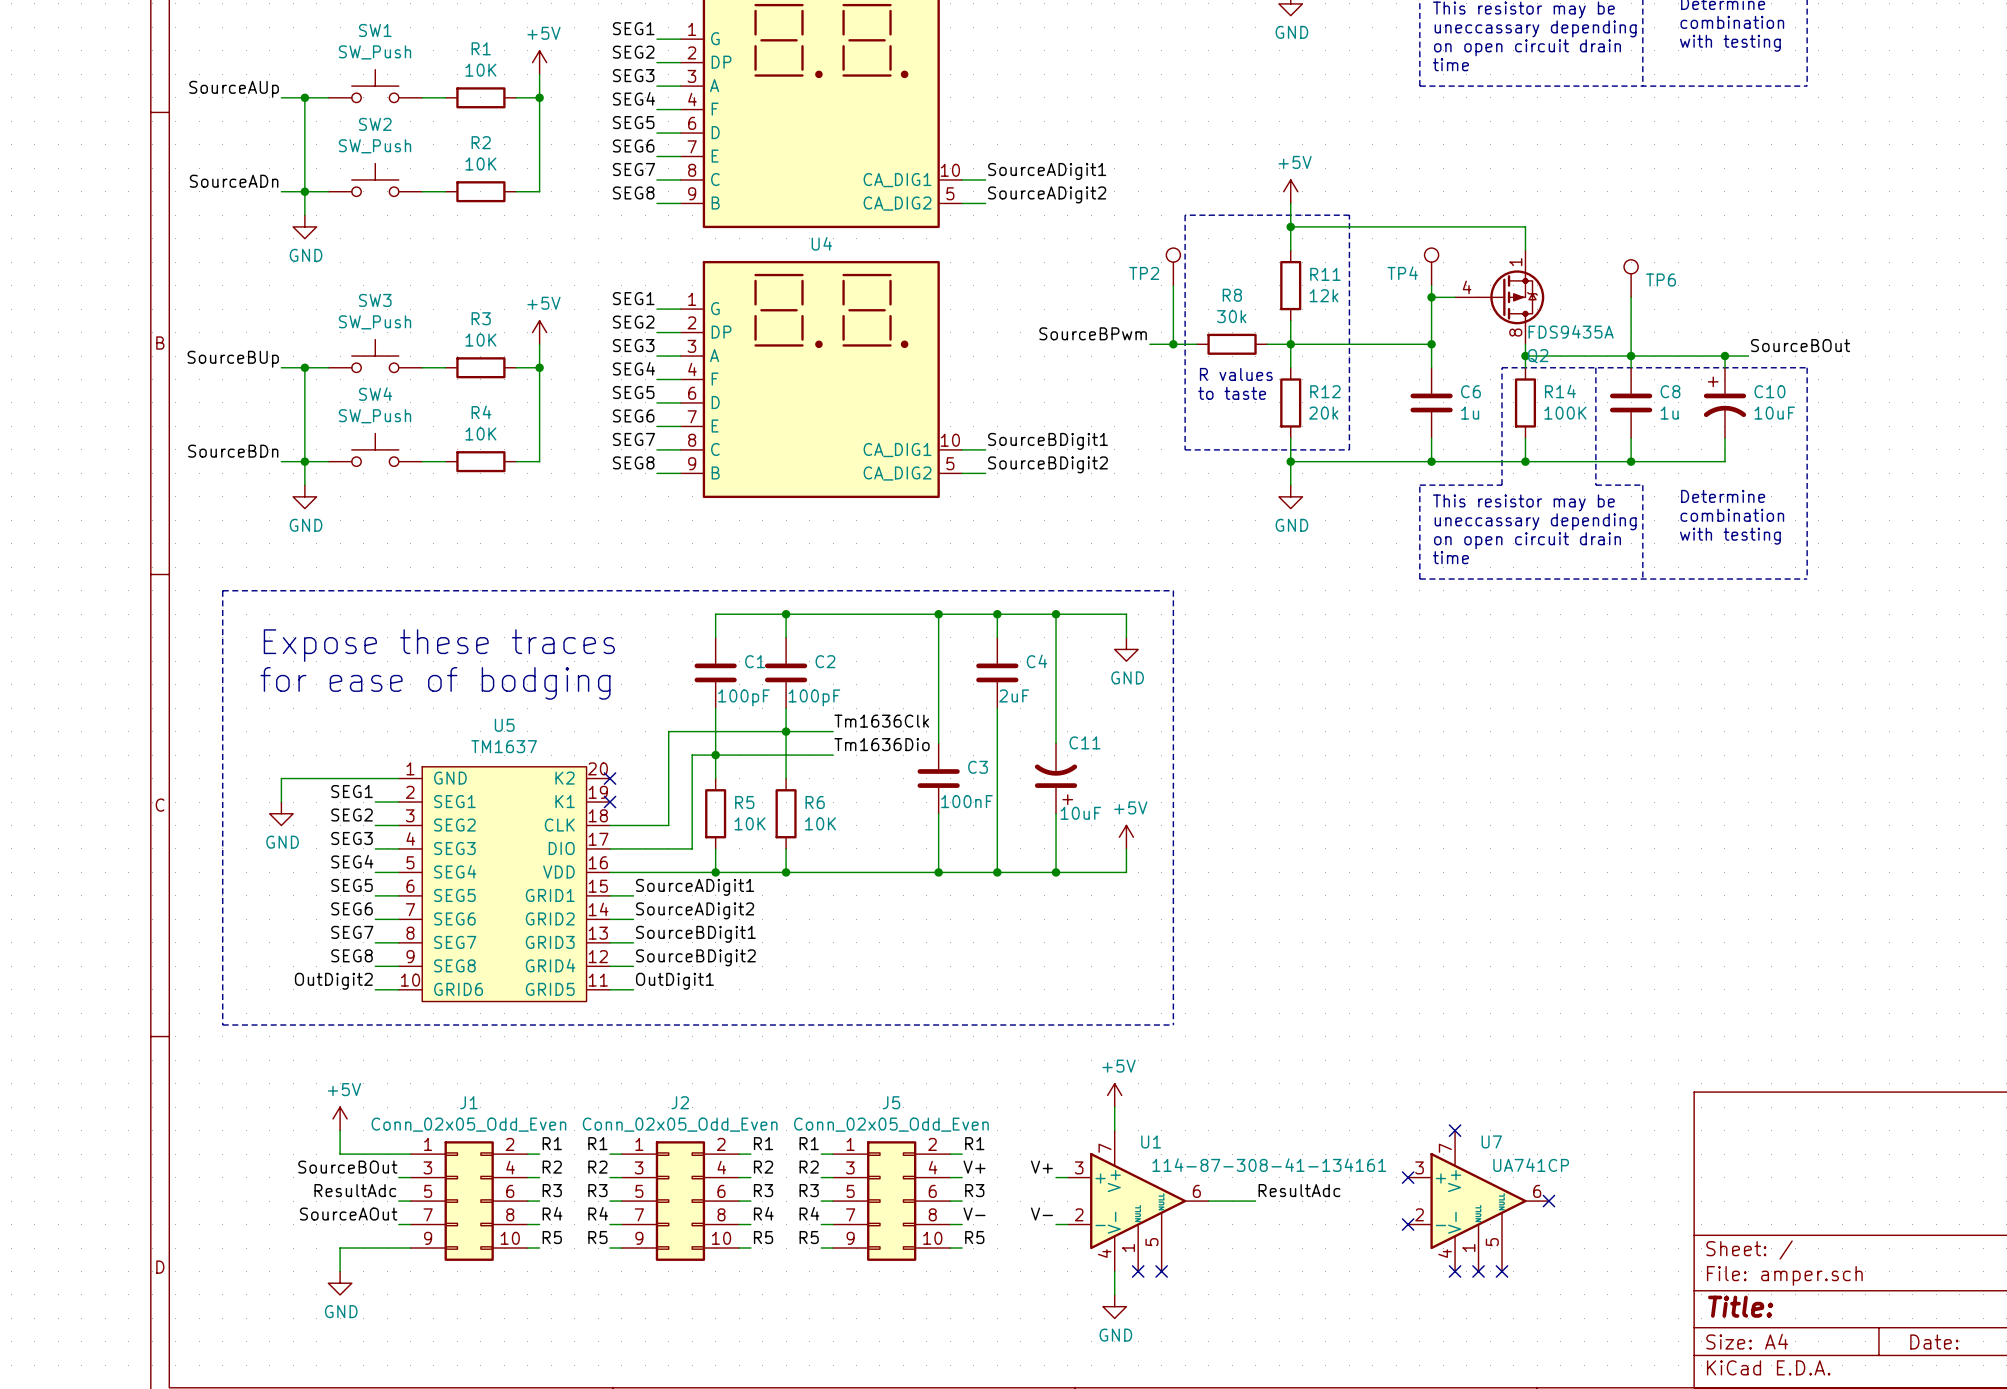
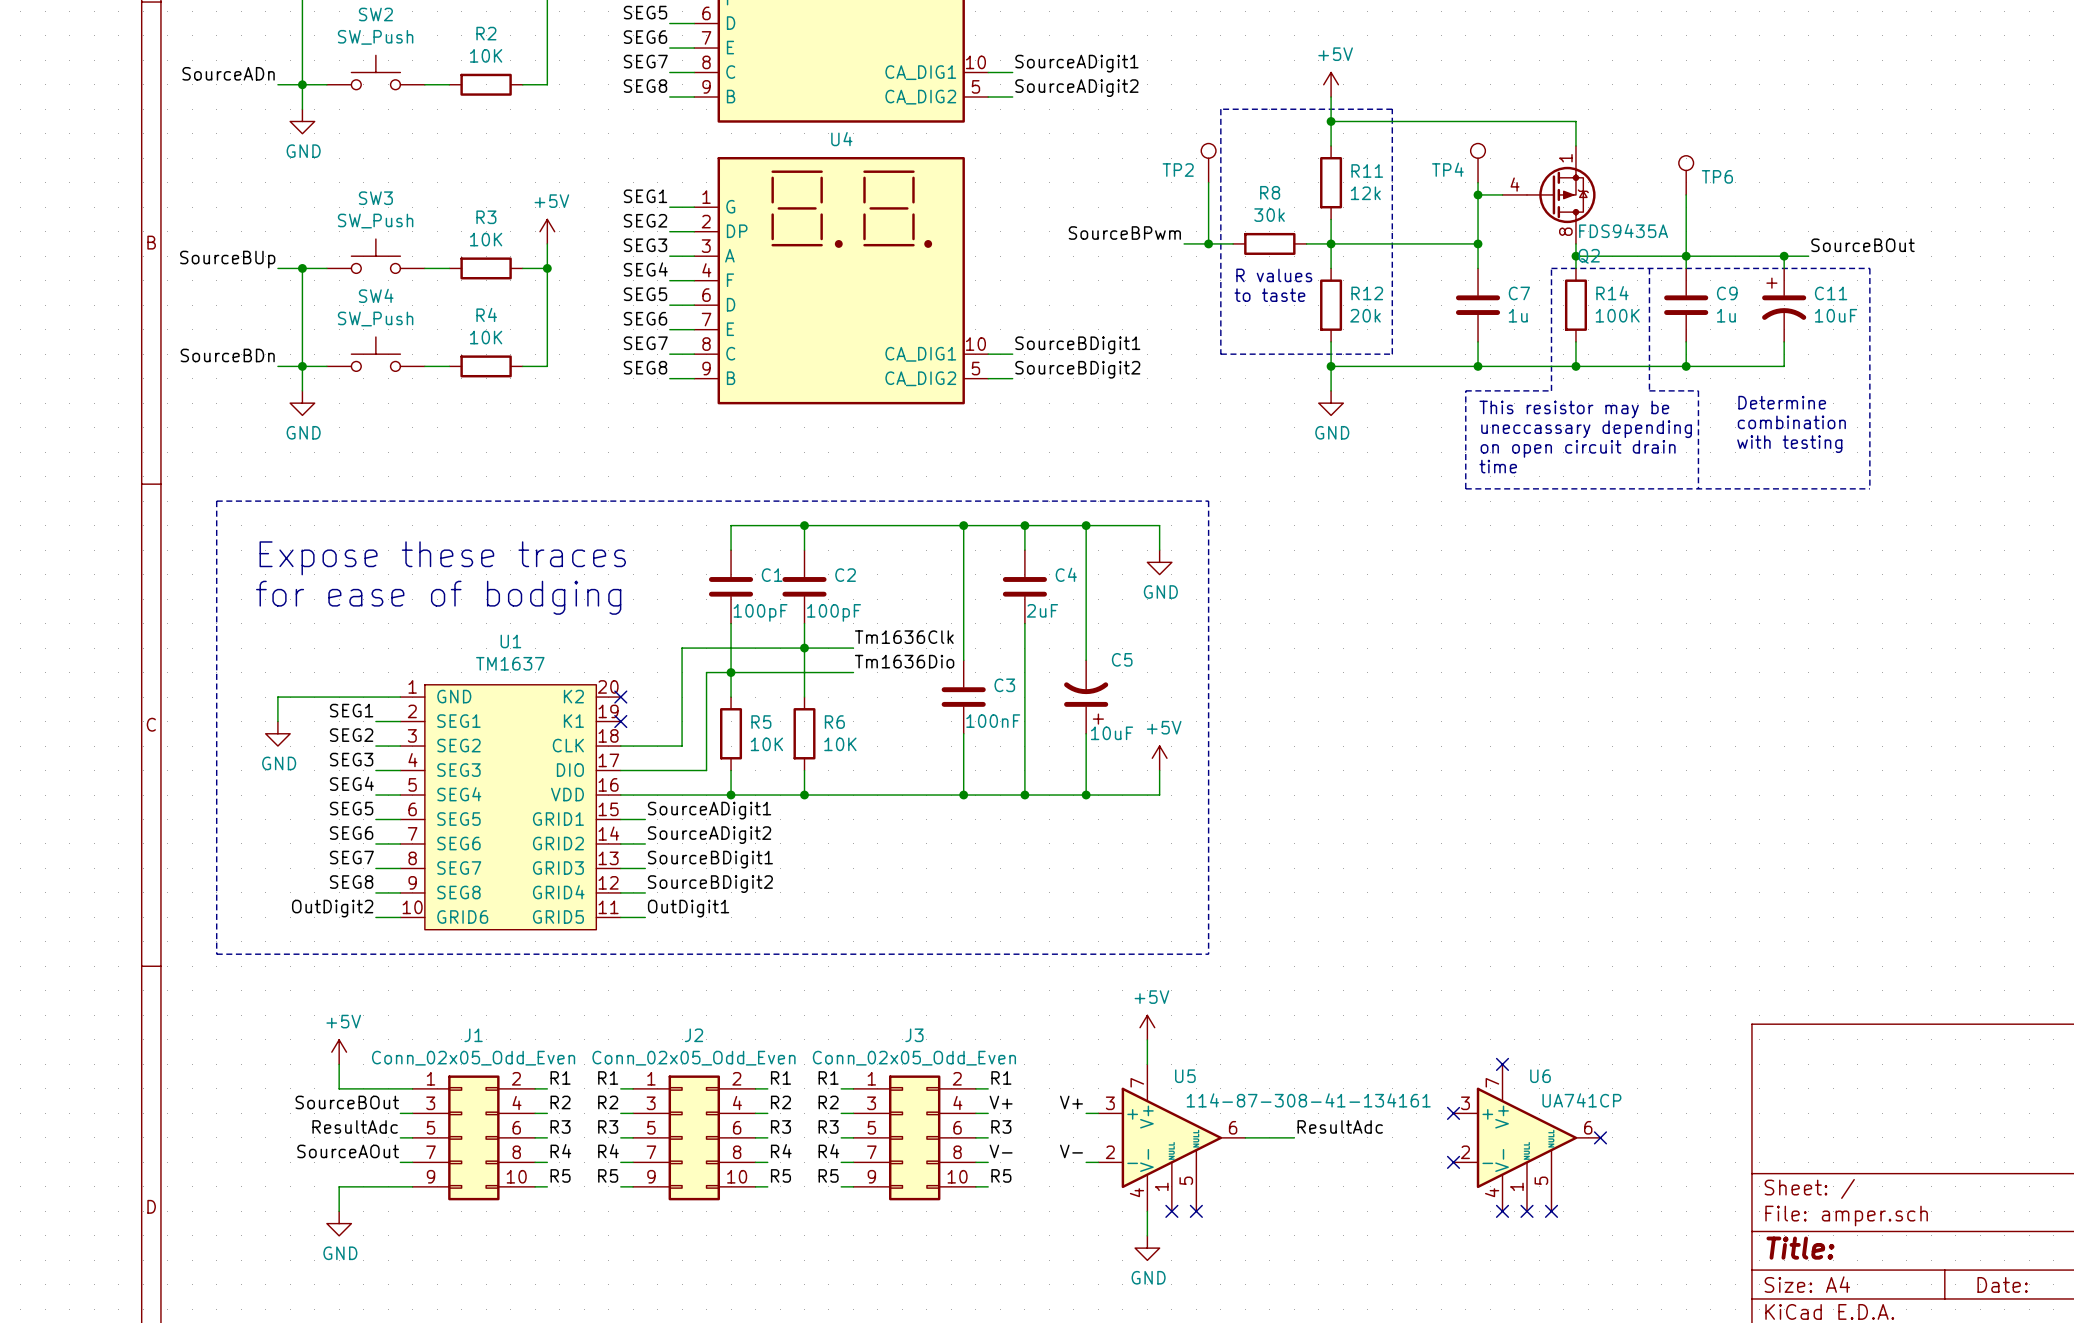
C6 name: C6 (1470, 391) -> C7 (1519, 293)
C8 name: C8 (1670, 391) -> C9 (1727, 293)
C10 name: C10 (1769, 391) -> C11 (1831, 293)
U5 name: U5 (504, 725) -> U1 (510, 641)
C11 name: C11 (1084, 742) -> C5 (1122, 659)
J5 name: J5 (891, 1102) -> J3 (914, 1035)
U1 name: U1 (1151, 1141) -> U5 (1185, 1076)
U7 name: U7 (1491, 1141) -> U6 (1540, 1076)

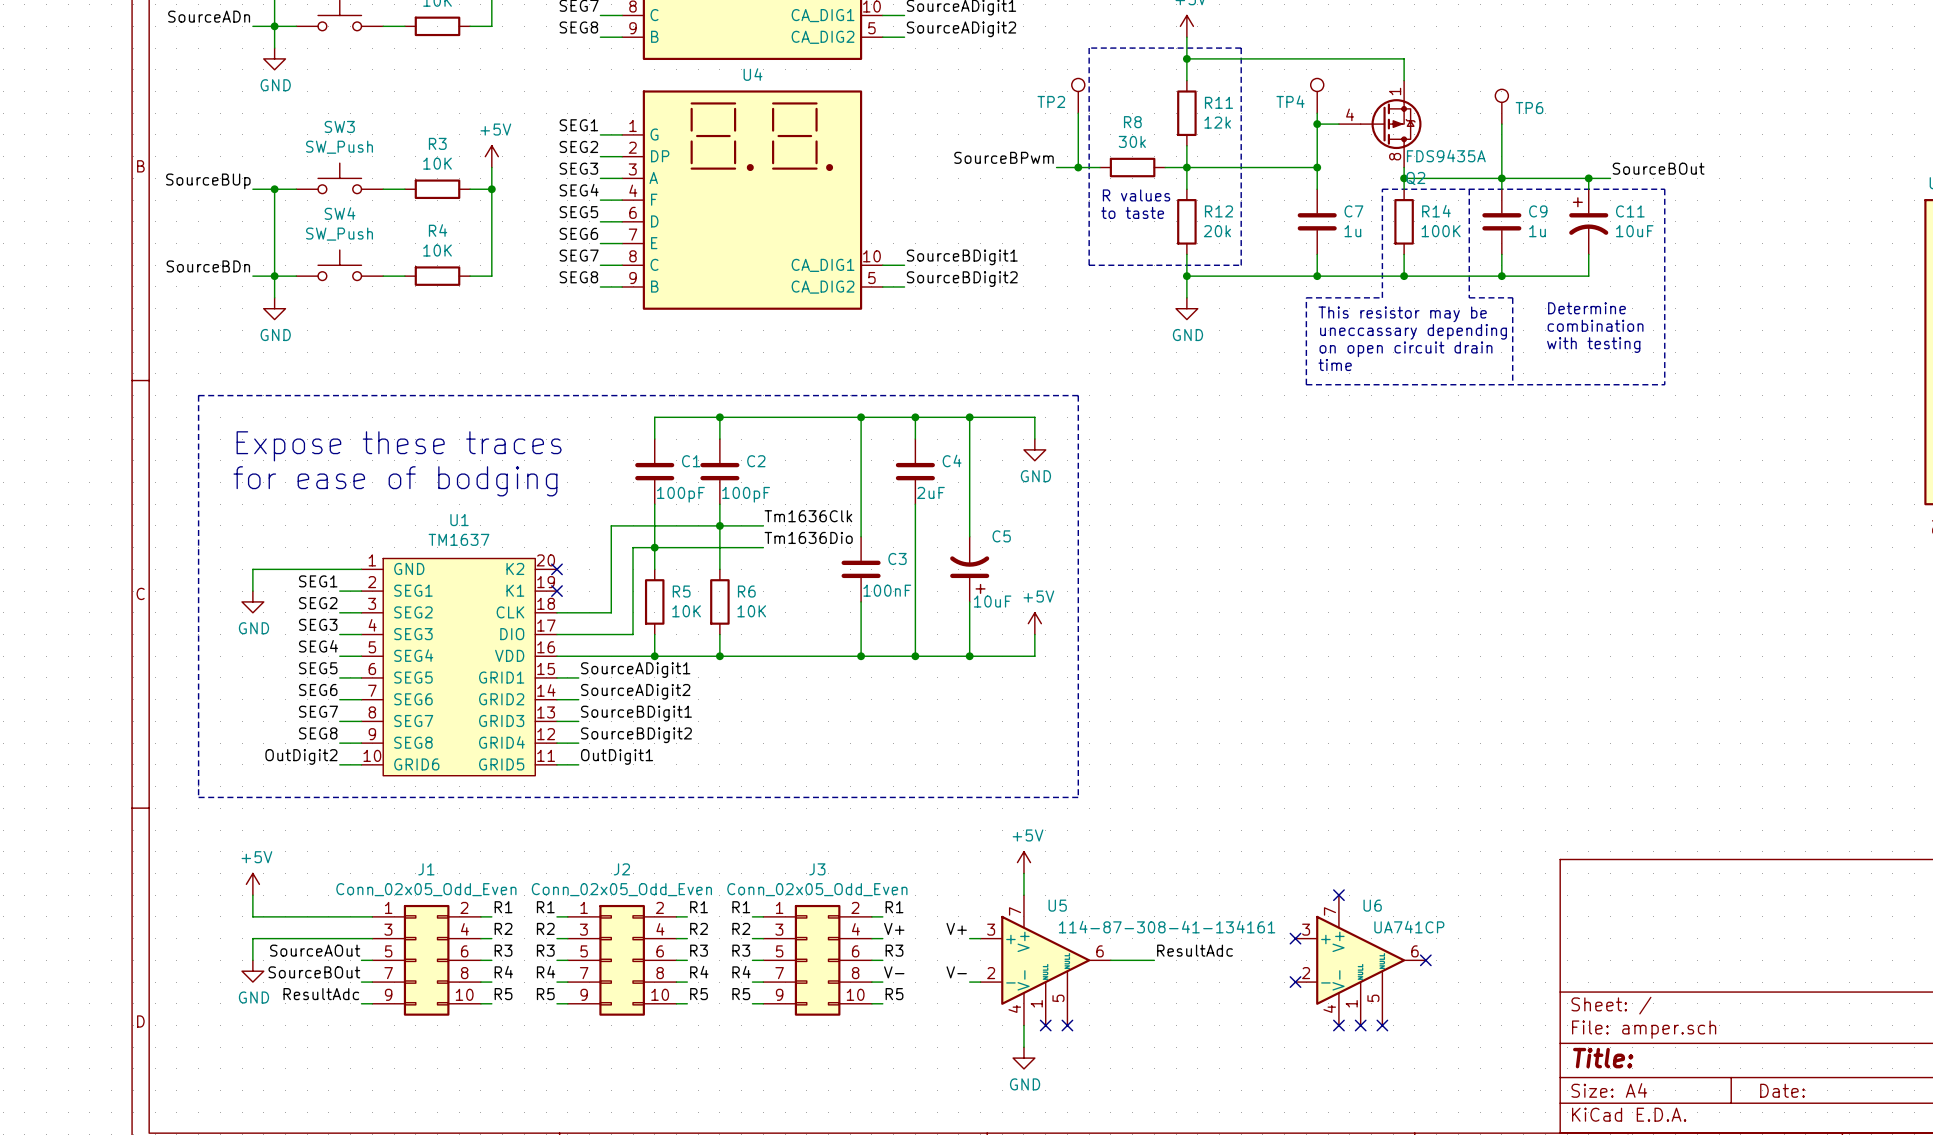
power symbol position: +5V (339, 1052) -> +5V (252, 884)
wire: (339, 1064) (339, 1088) -> (252, 895) (252, 916) (307, 916)
label: SourceBOut (347, 1102) -> none
wire: none -> (361, 938) (252, 938) (252, 960)
label: ResultAdc (355, 1126) -> SourceAOut (315, 950)
label: SourceAOut (348, 1151) -> SourceBOut (314, 972)
label: none -> ResultAdc (321, 994)
wire: (400, 1186) (339, 1186) (339, 1211) -> none
power symbol position: GND (339, 1223) -> GND (252, 971)

